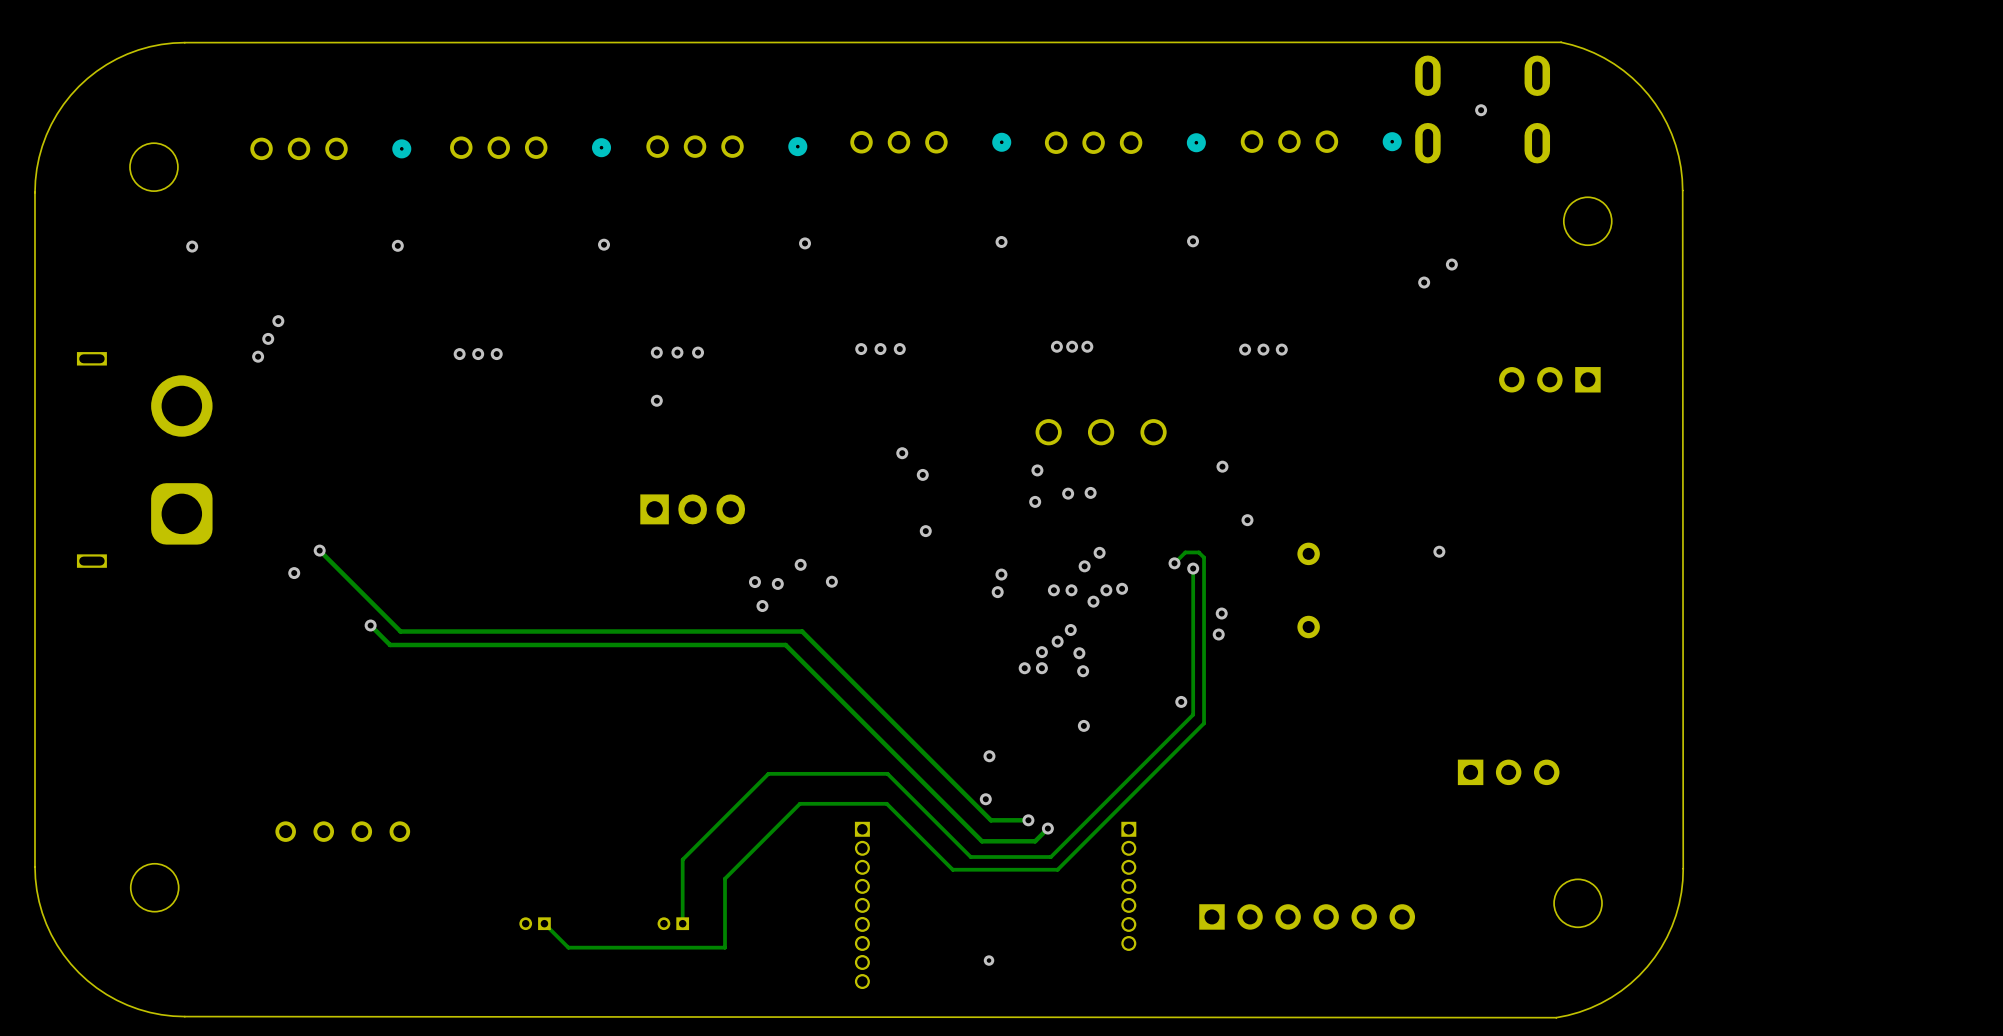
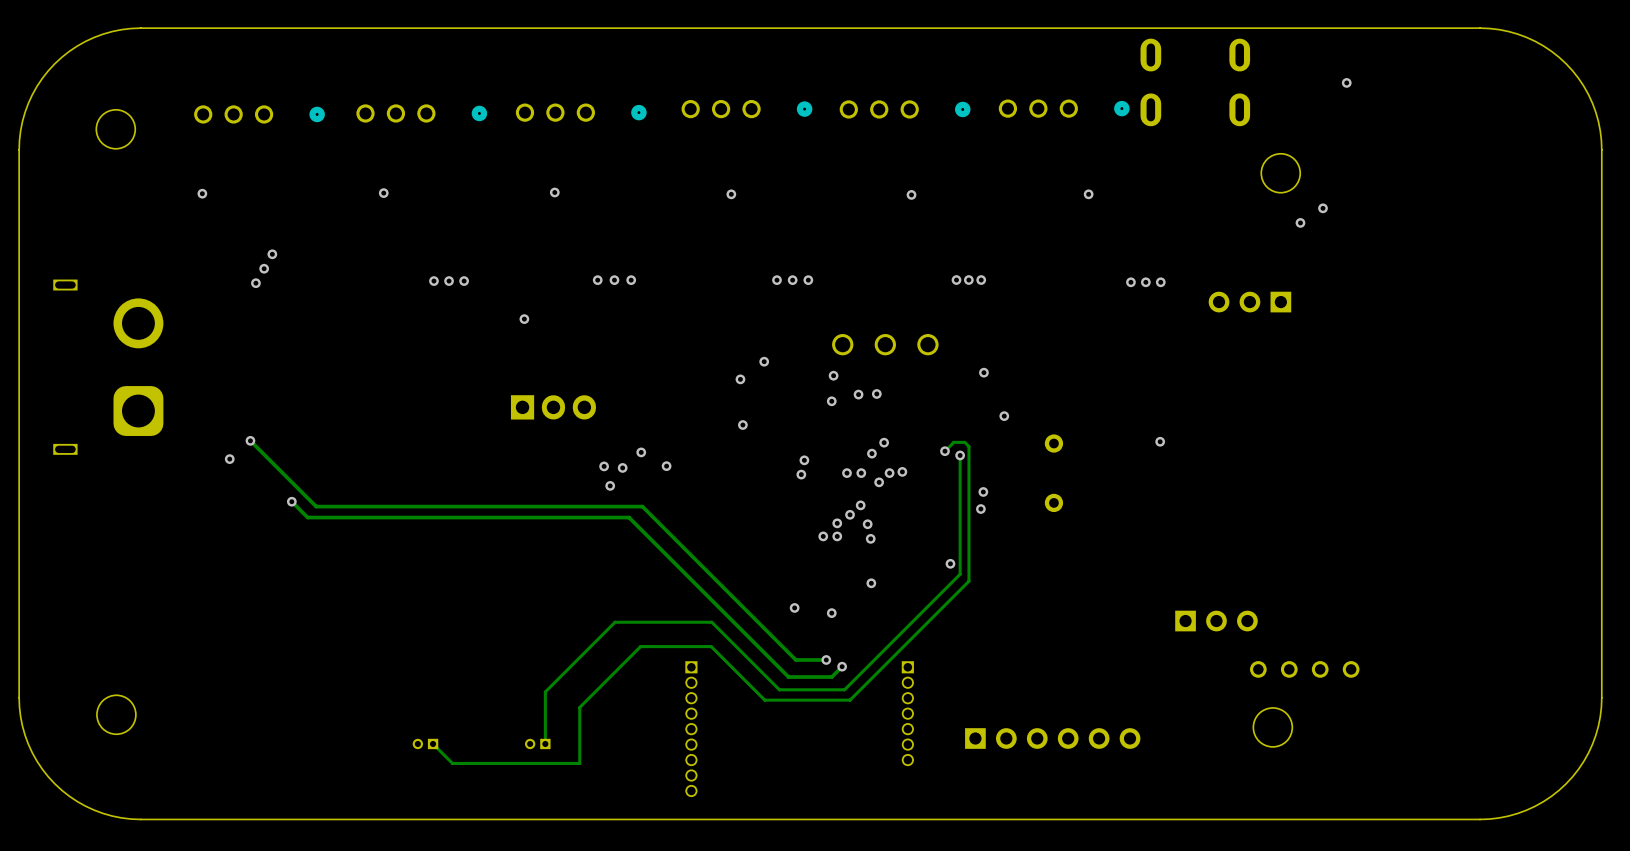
board edge: (184, 42) (1561, 42) (1583, 48) (1604, 58) (1632, 78) (1648, 94) (1661, 113) (1675, 145) (1682, 179) (1683, 868) (1679, 903) (1671, 926) (1661, 947) (1647, 966) (1630, 983) (1601, 1003) (1579, 1012) (1556, 1017) (184, 1016) -> (140, 28) (1489, 28) (1517, 34) (1535, 41) (1551, 51) (1572, 70) (1583, 86) (1595, 112) (1601, 149) (1601, 707) (1595, 735) (1578, 769) (1559, 790) (1526, 810) (1508, 816) (1480, 819) (140, 819)
via: (1481, 110) -> none
via: none -> (1346, 82)
via: (1001, 241) -> none
via: (1193, 241) -> none
via: (805, 243) -> none
via: (604, 244) -> none
via: none -> (554, 192)
via: (397, 245) -> none
via: none -> (383, 193)
via: (192, 246) -> none
via: none -> (202, 193)
via: none -> (731, 194)
via: none -> (911, 194)
via: none -> (1088, 194)
via: (1451, 264) -> none
via: none -> (1323, 208)
via: (1424, 282) -> none
via: none -> (1300, 222)
via: none -> (272, 254)
via: (278, 321) -> none
via: (268, 338) -> none
via: none -> (264, 268)
via: (1056, 346) -> none
via: (1072, 346) -> none
via: (1087, 346) -> none
via: (861, 349) -> none
via: (880, 349) -> none
via: (899, 349) -> none
via: (1245, 349) -> none
via: (1263, 349) -> none
via: (1281, 349) -> none
via: (656, 352) -> none
via: (677, 352) -> none
via: (698, 352) -> none
via: none -> (597, 280)
via: none -> (614, 280)
via: none -> (631, 280)
via: none -> (776, 280)
via: none -> (792, 280)
via: none -> (808, 280)
via: none -> (956, 280)
via: none -> (968, 280)
via: none -> (981, 280)
via: none -> (433, 281)
via: none -> (449, 281)
via: none -> (464, 281)
via: (459, 354) -> none
via: (478, 354) -> none
via: (496, 354) -> none
via: none -> (1130, 282)
via: none -> (1145, 282)
via: none -> (1160, 282)
via: (258, 356) -> none
via: none -> (255, 283)
via position: (902, 453) -> (764, 361)
via position: (985, 799) -> (831, 613)
part: (342, 831) -> none
part: none -> (1304, 669)
via: (989, 960) -> none

